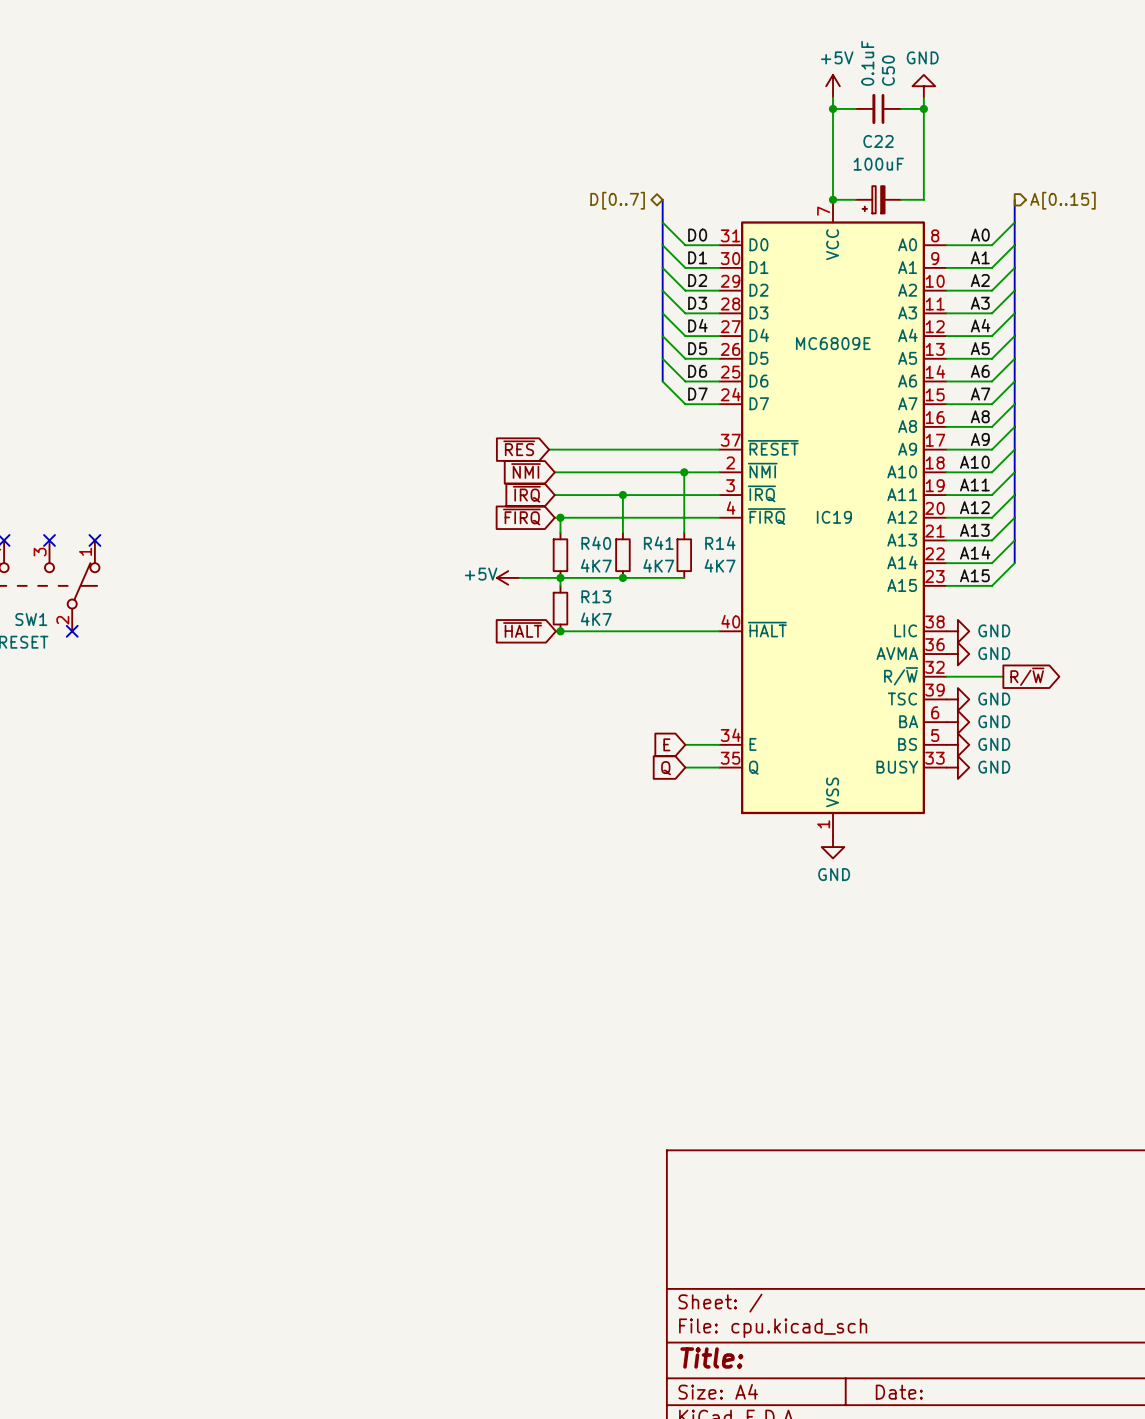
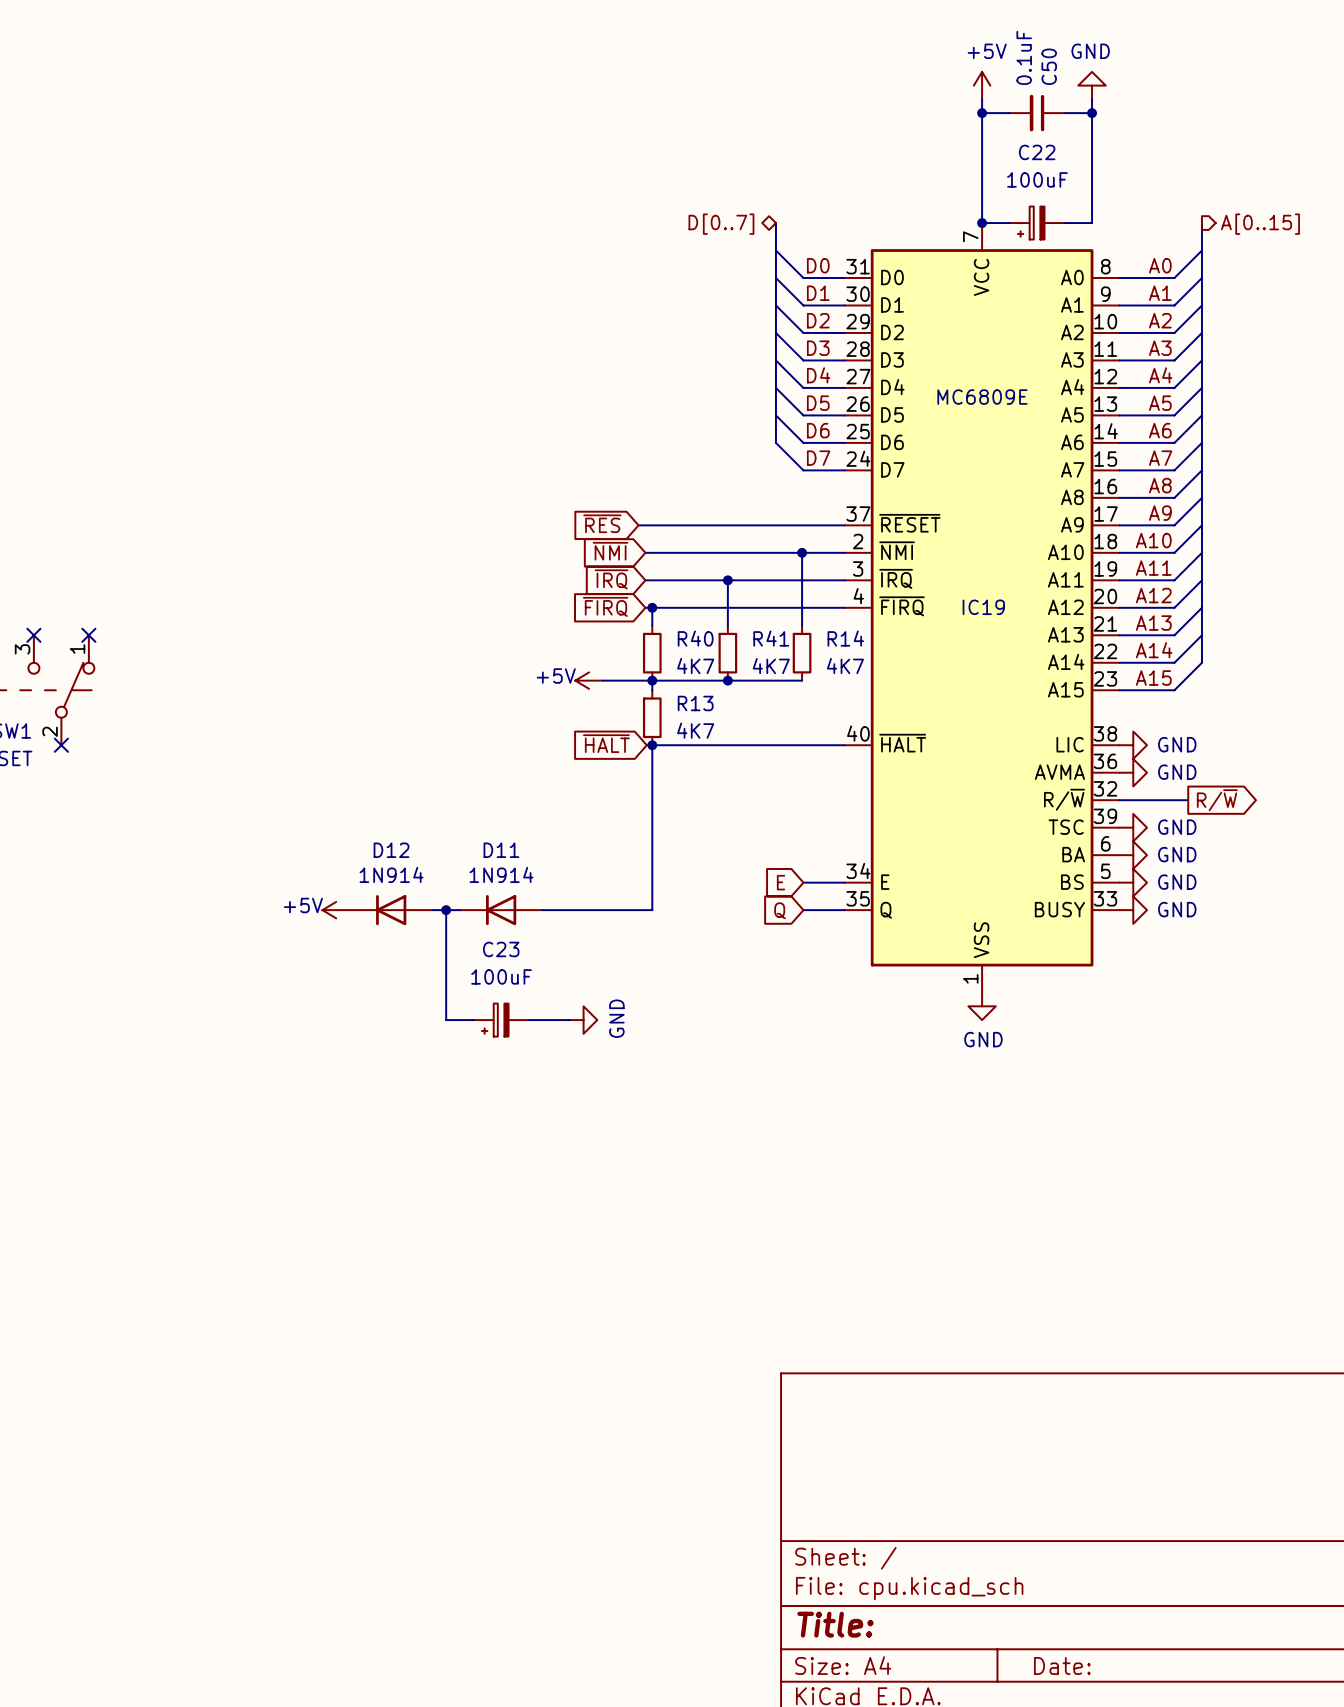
wire: none -> (652, 745) (652, 910) (542, 910)
power symbol: none -> +5V (336, 910)
D12: none -> 1N914 (391, 910)
wire: none -> (432, 910) (459, 910)
wire: none -> (446, 910) (446, 1020) (473, 1020)
junction: none -> (446, 910)
D11: none -> 1N914 (501, 910)
C23: none -> 100uF (501, 1020)
wire: none -> (528, 1020) (569, 1020)
power symbol: none -> GND (583, 1020)

